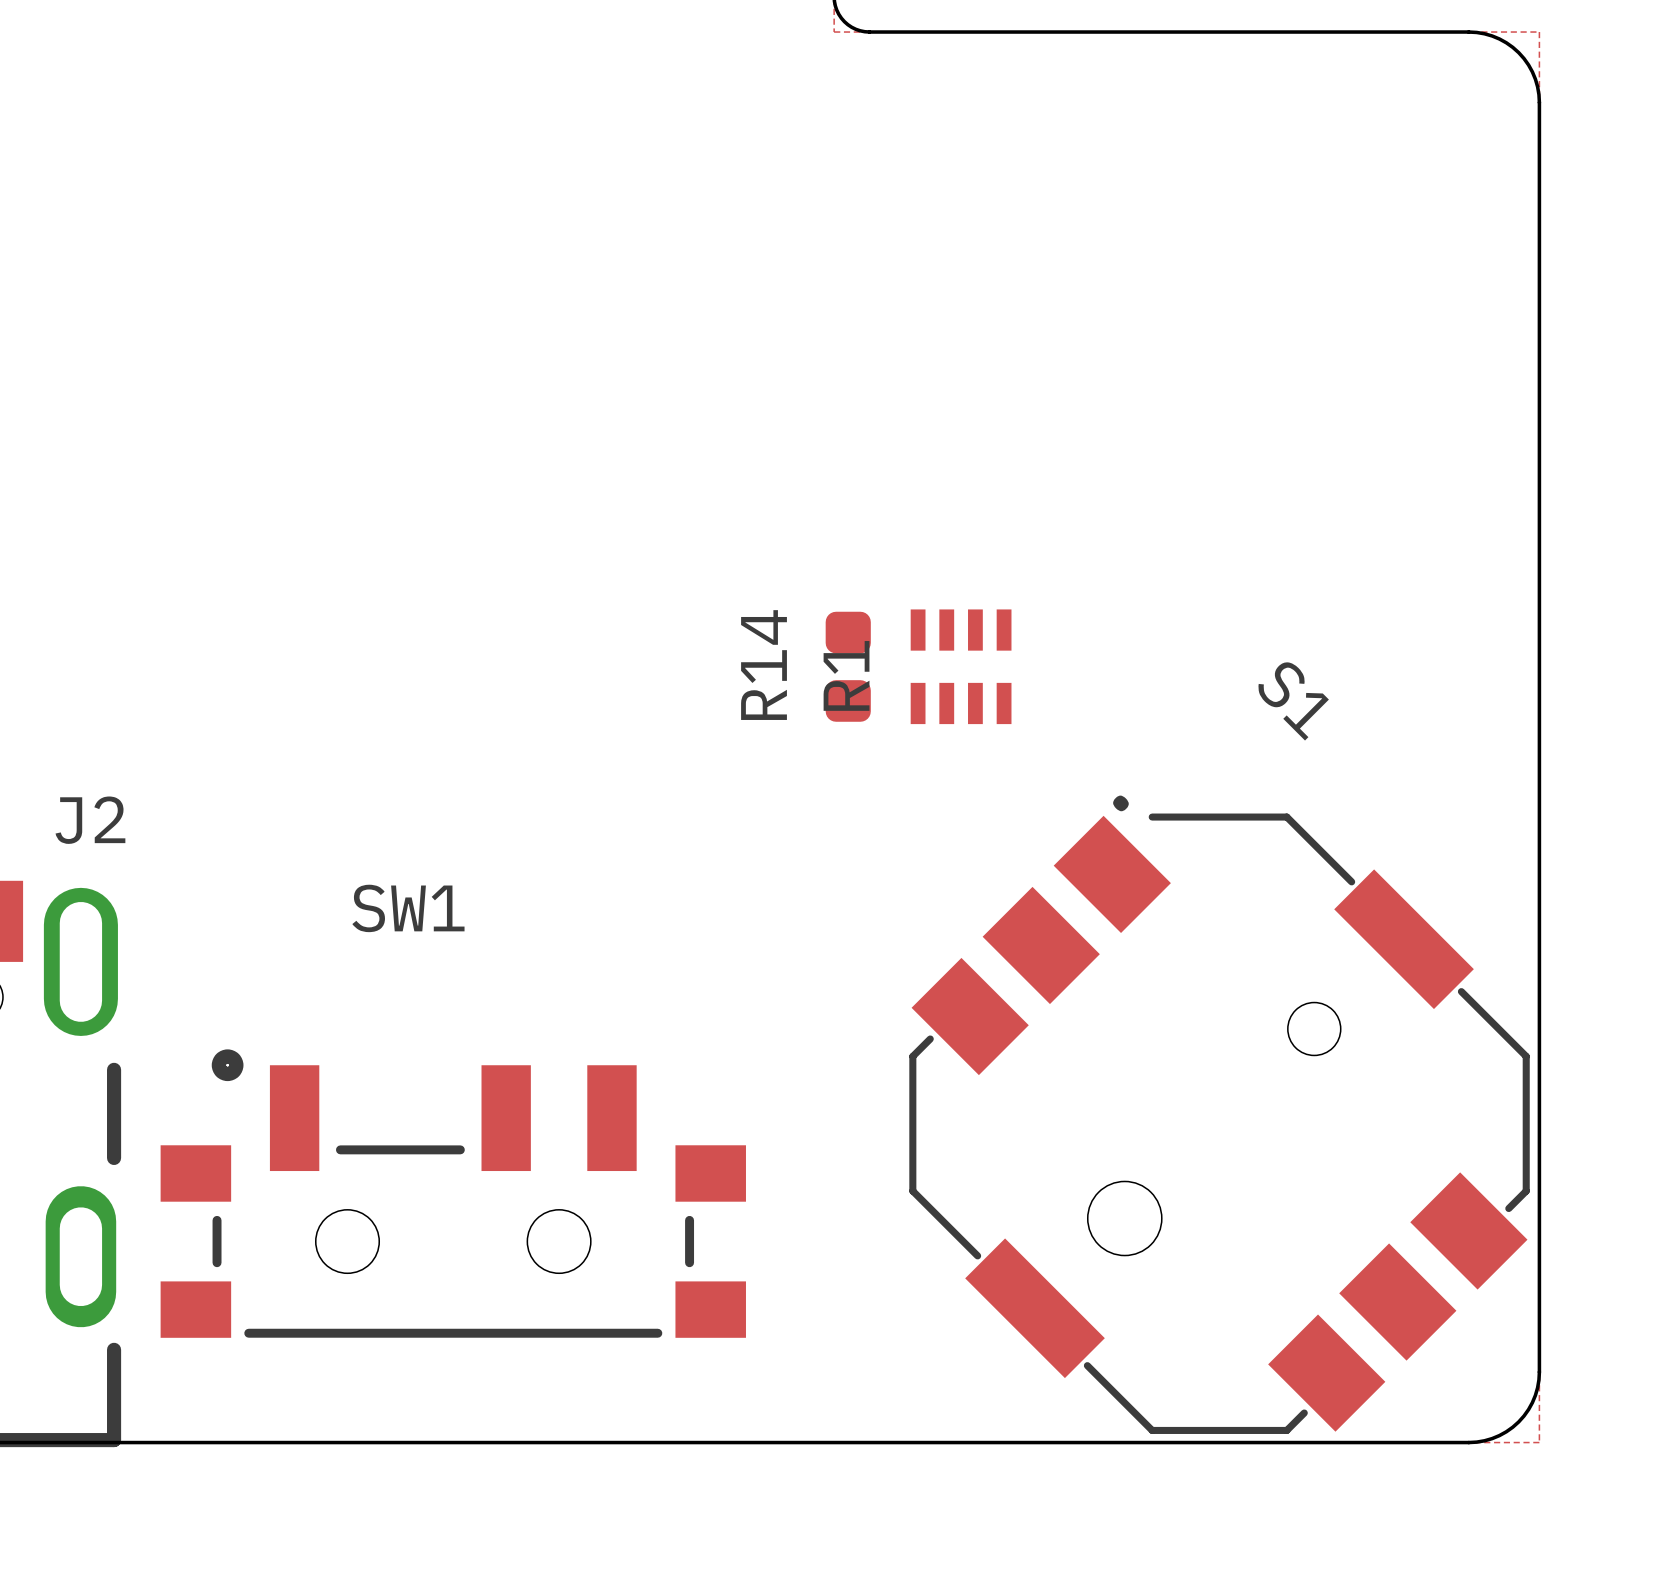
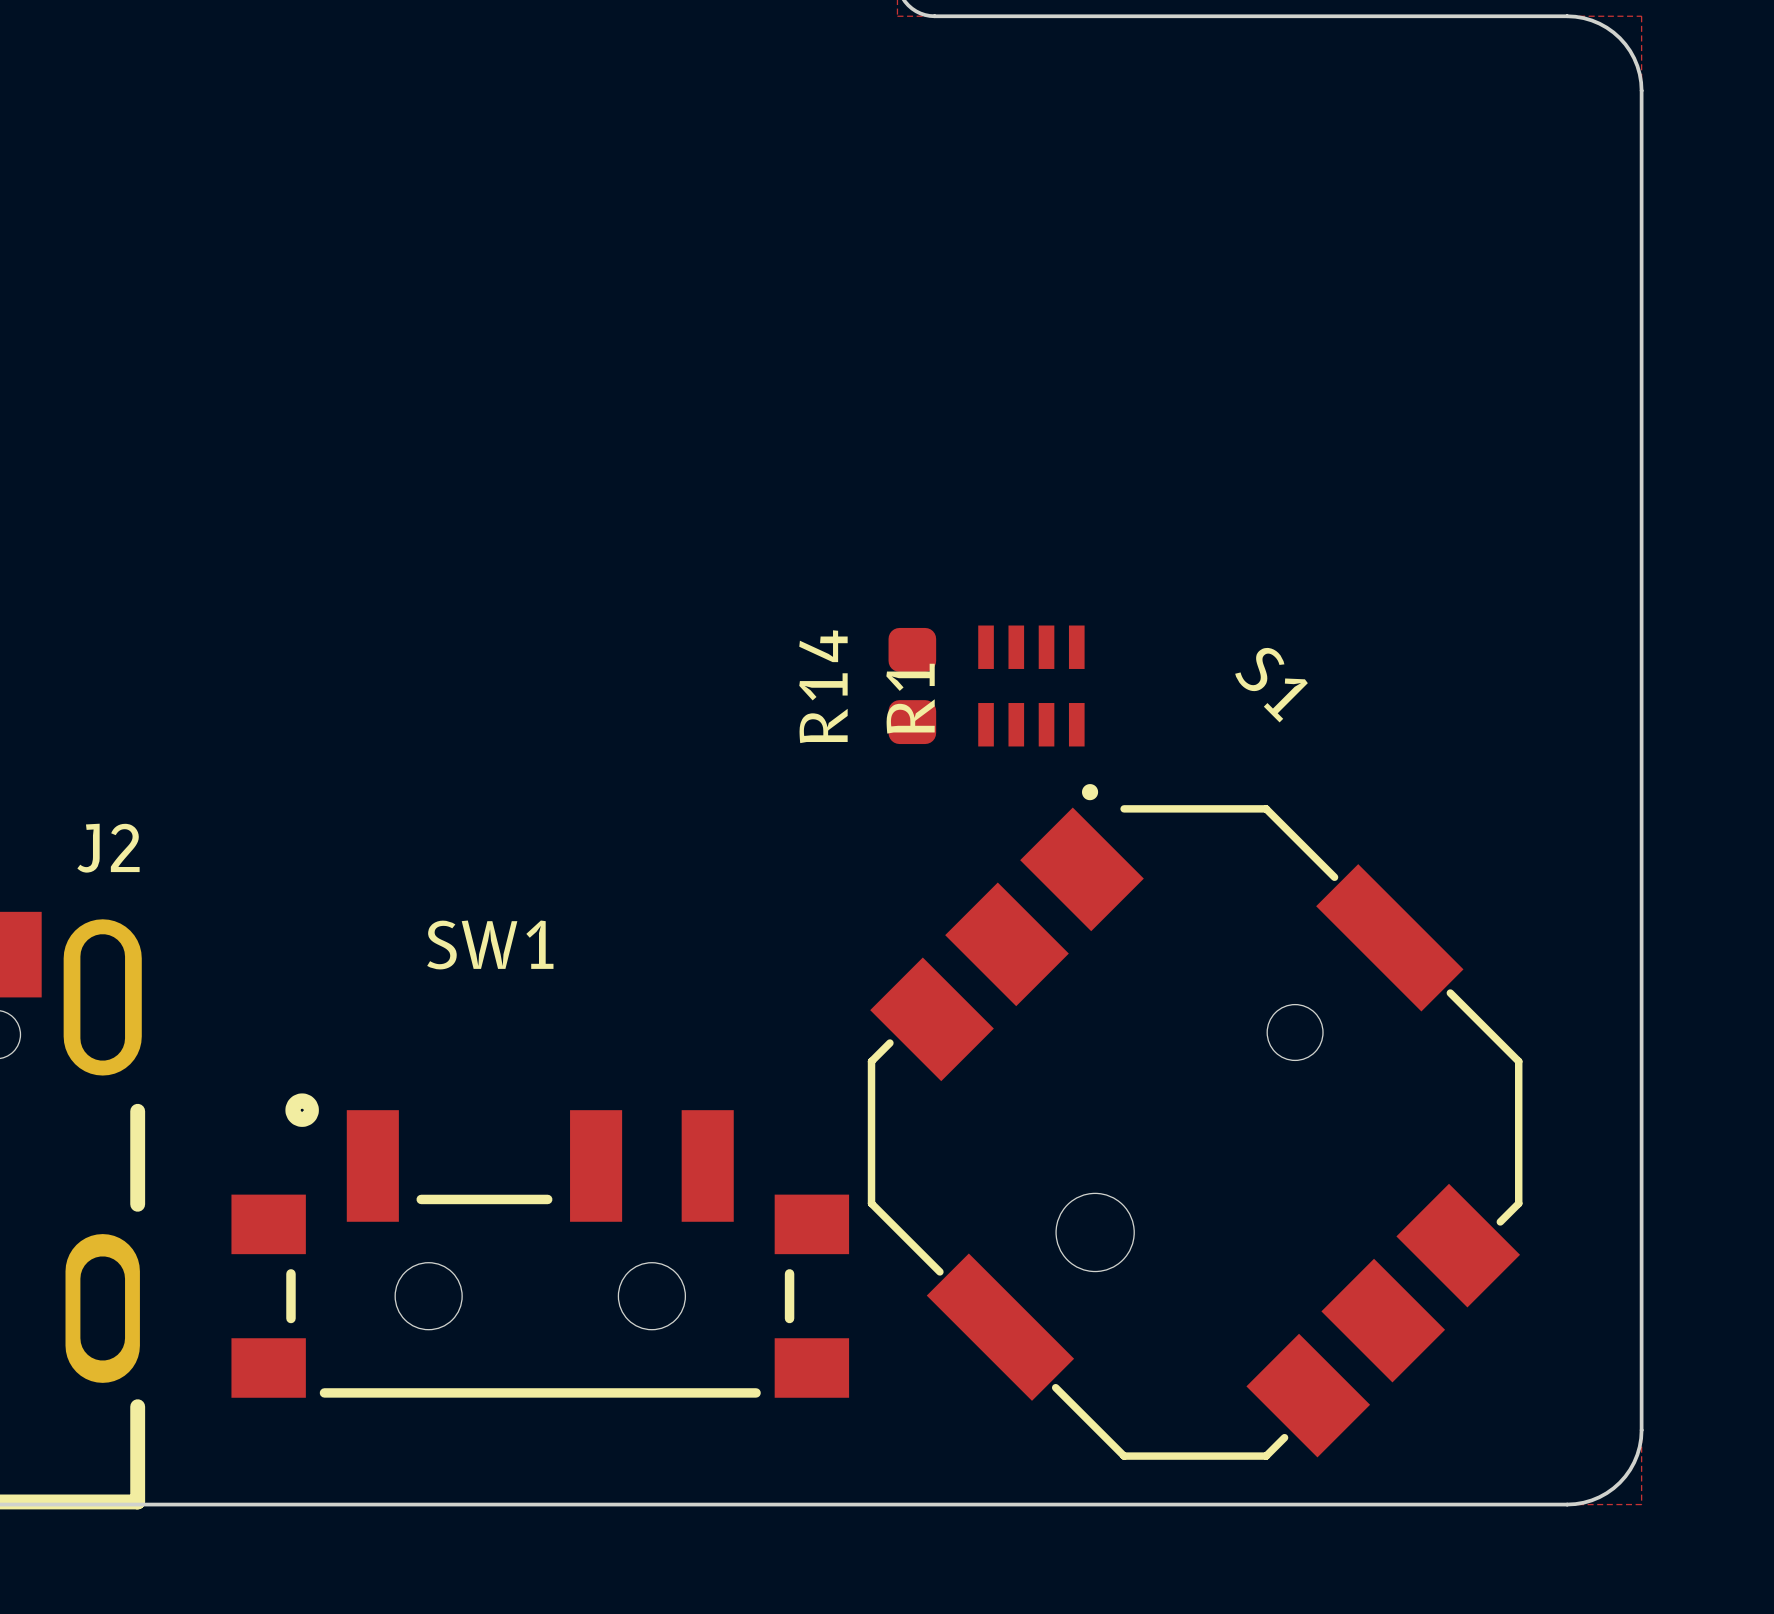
S1 position: (1219, 1123) -> (1195, 1132)
SW1 position: (453, 1193) -> (540, 1245)

